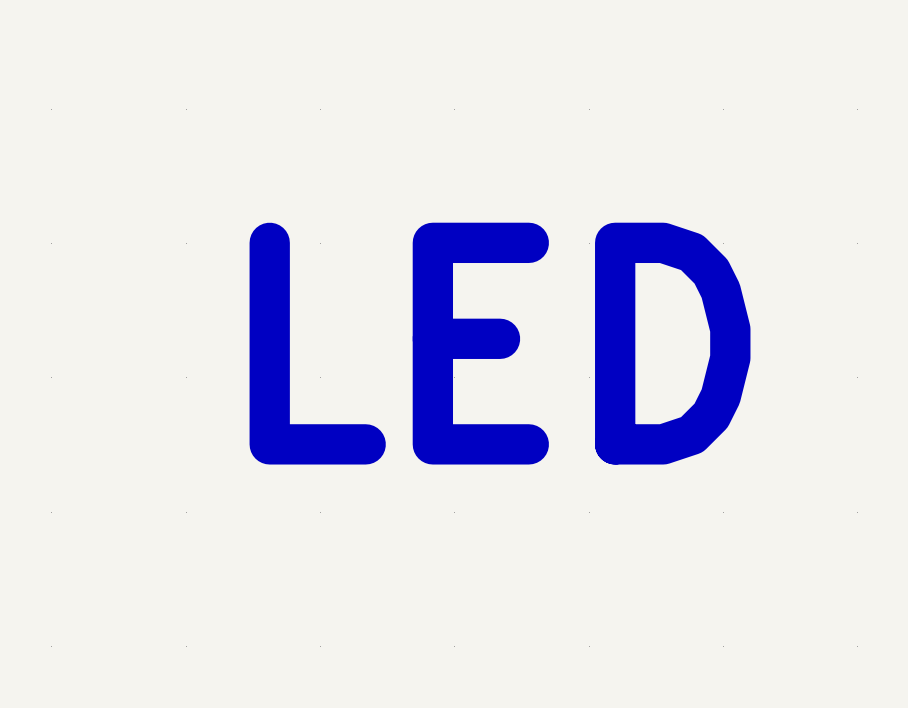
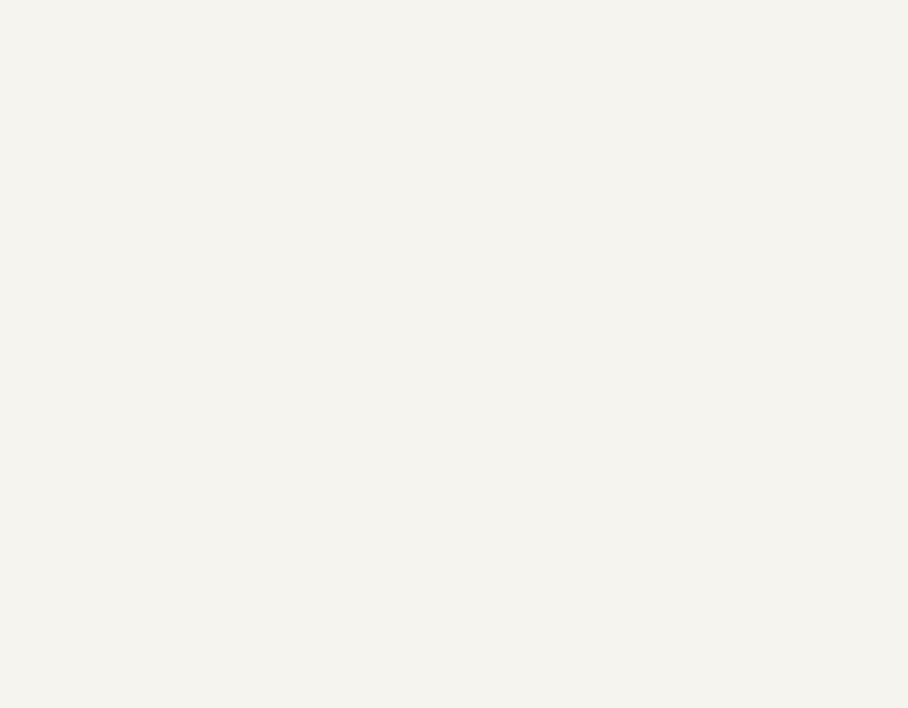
text: LED (500, 343) -> none

